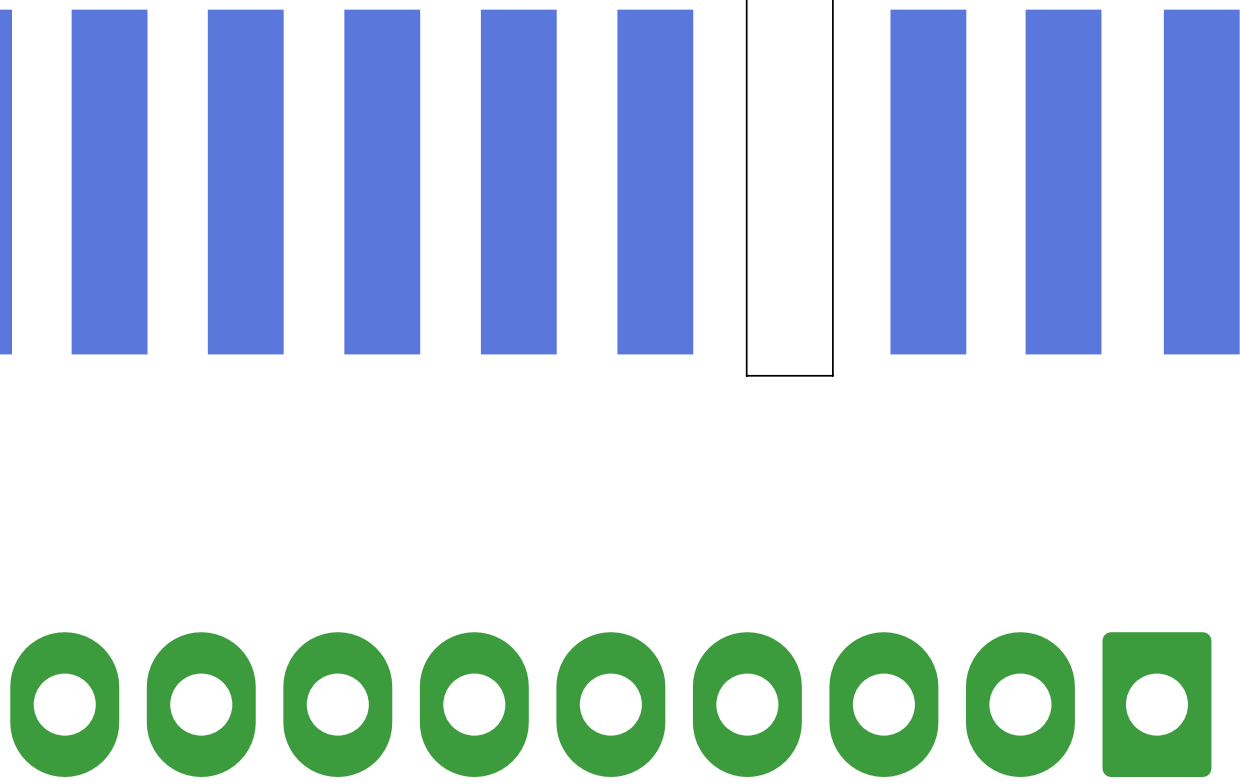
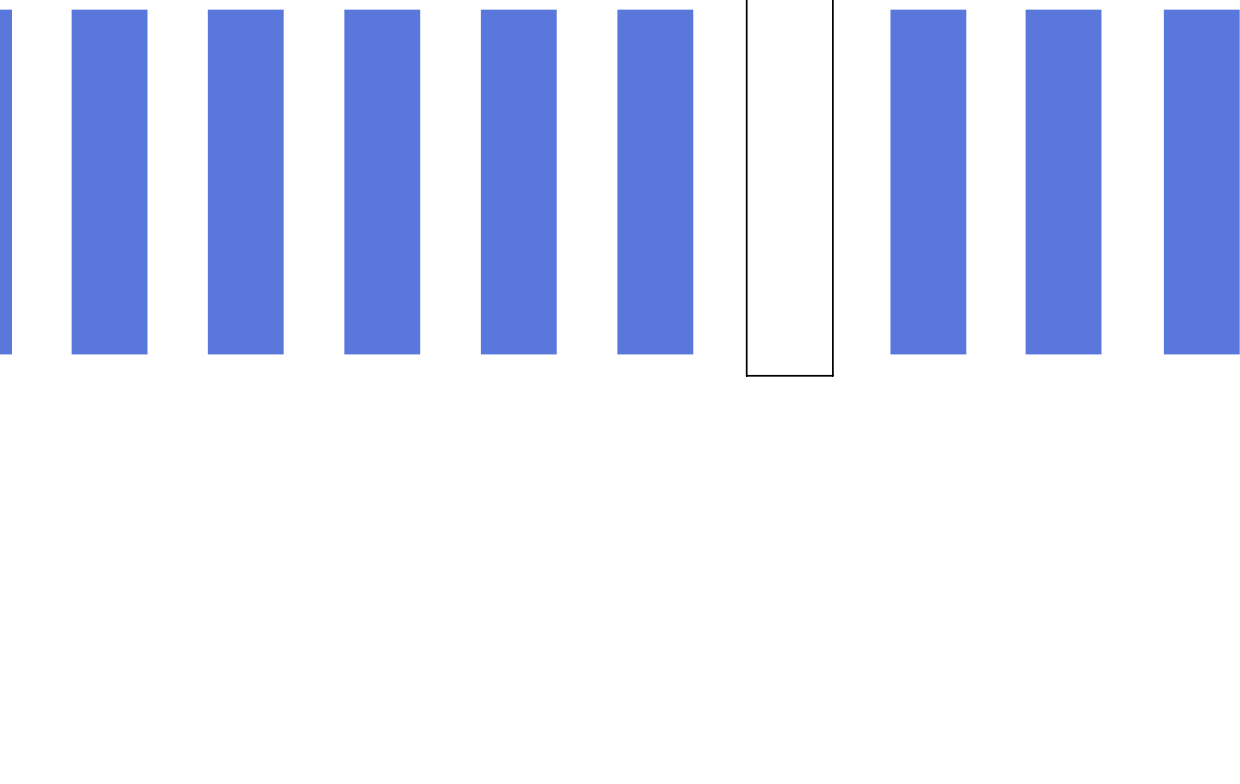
part: (610, 704) -> none

